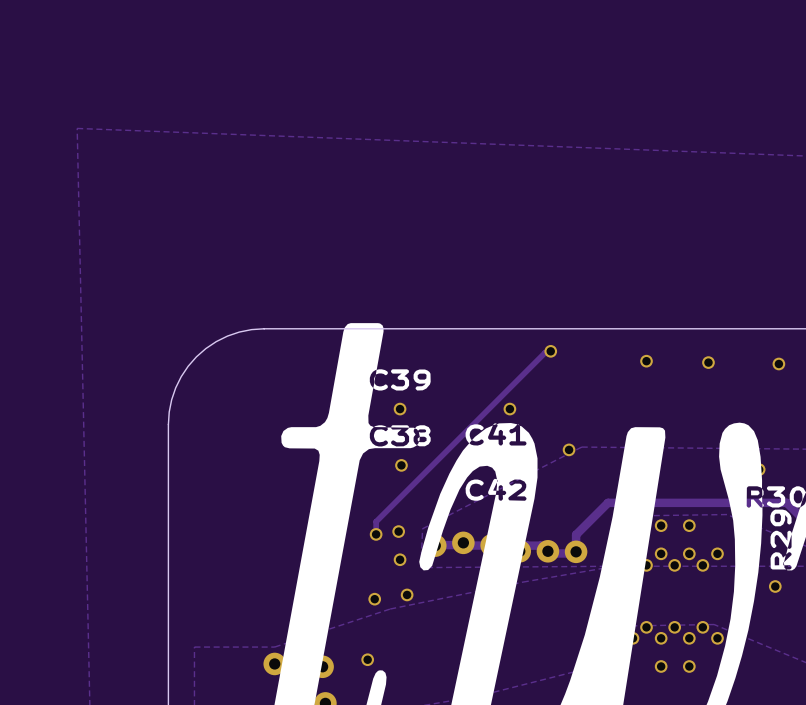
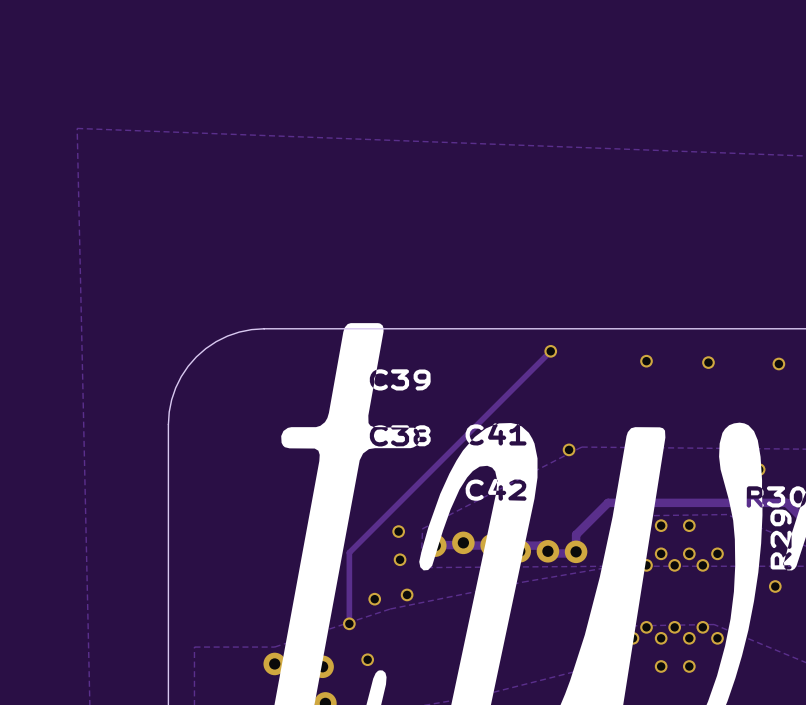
track: (549, 352) (545, 352) (376, 521) (376, 534) -> (549, 352) (349, 552) (349, 623)
via: (400, 409) -> none
via: (509, 409) -> none
via: (401, 465) -> none
via: (376, 534) -> none
via: none -> (349, 623)

